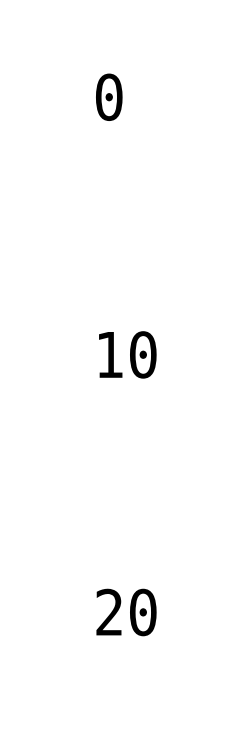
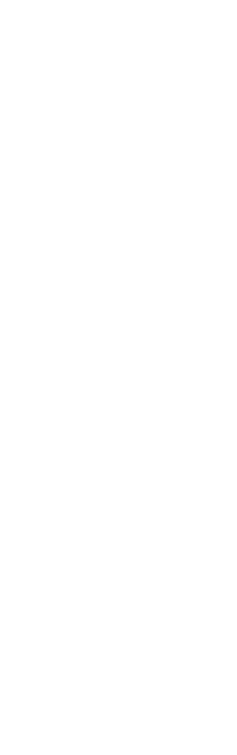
text: 0 (109, 97) -> none
text: 10 (127, 354) -> none
text: 20 (126, 612) -> none

